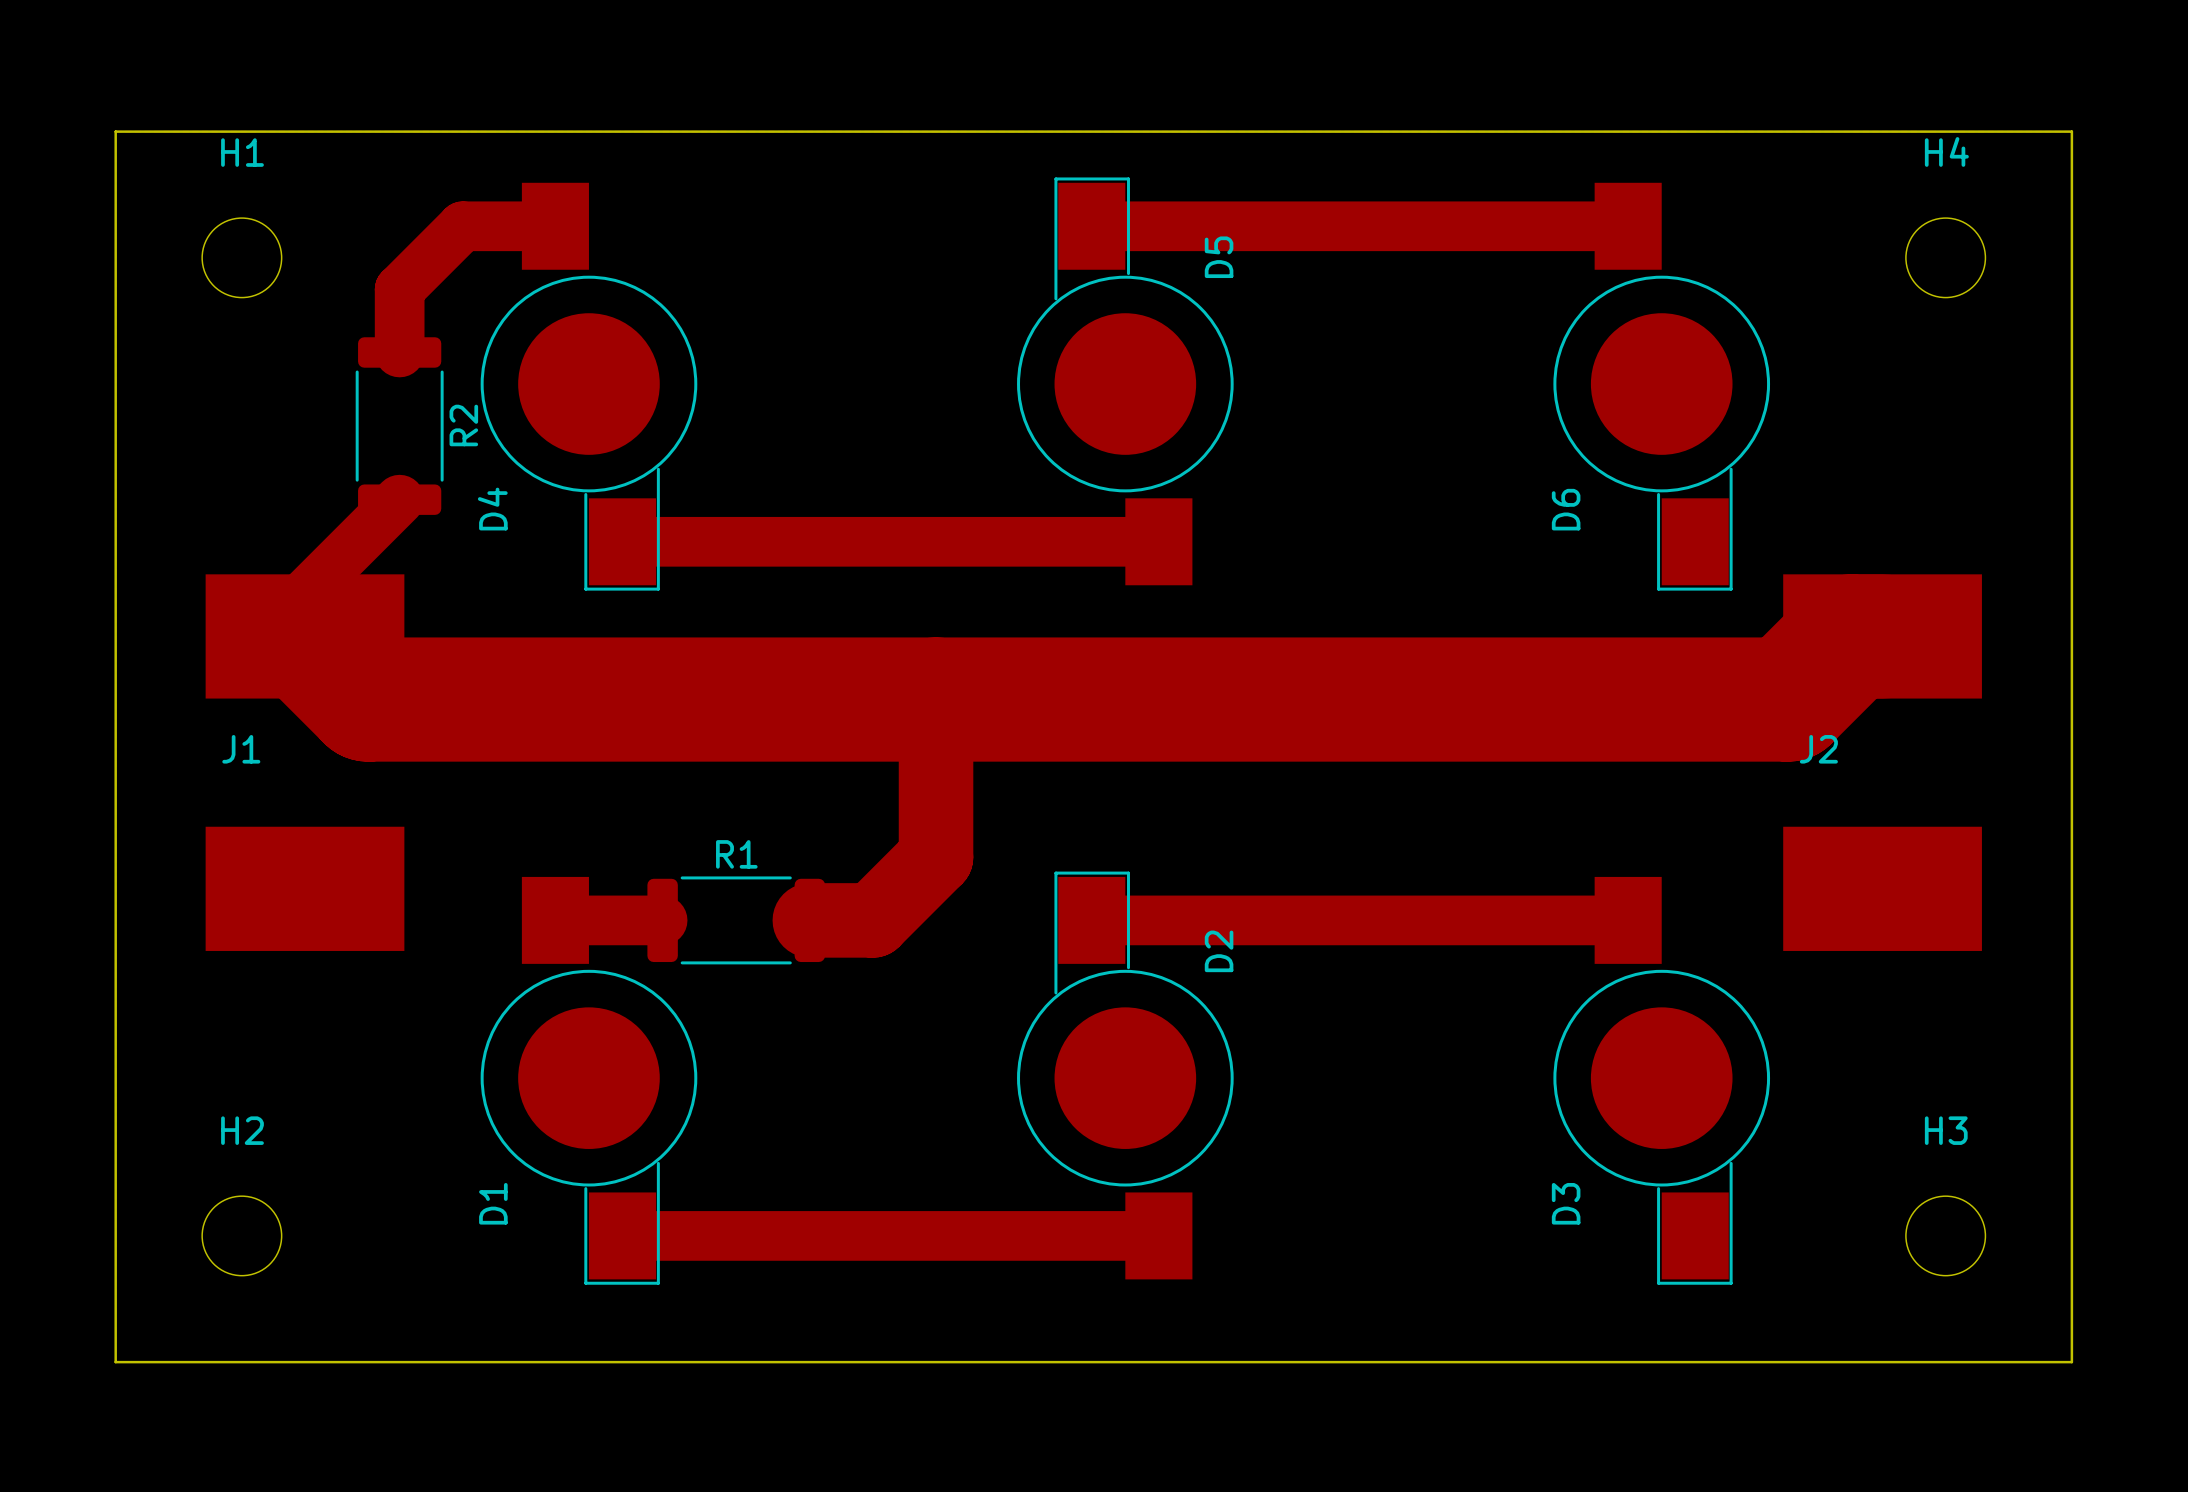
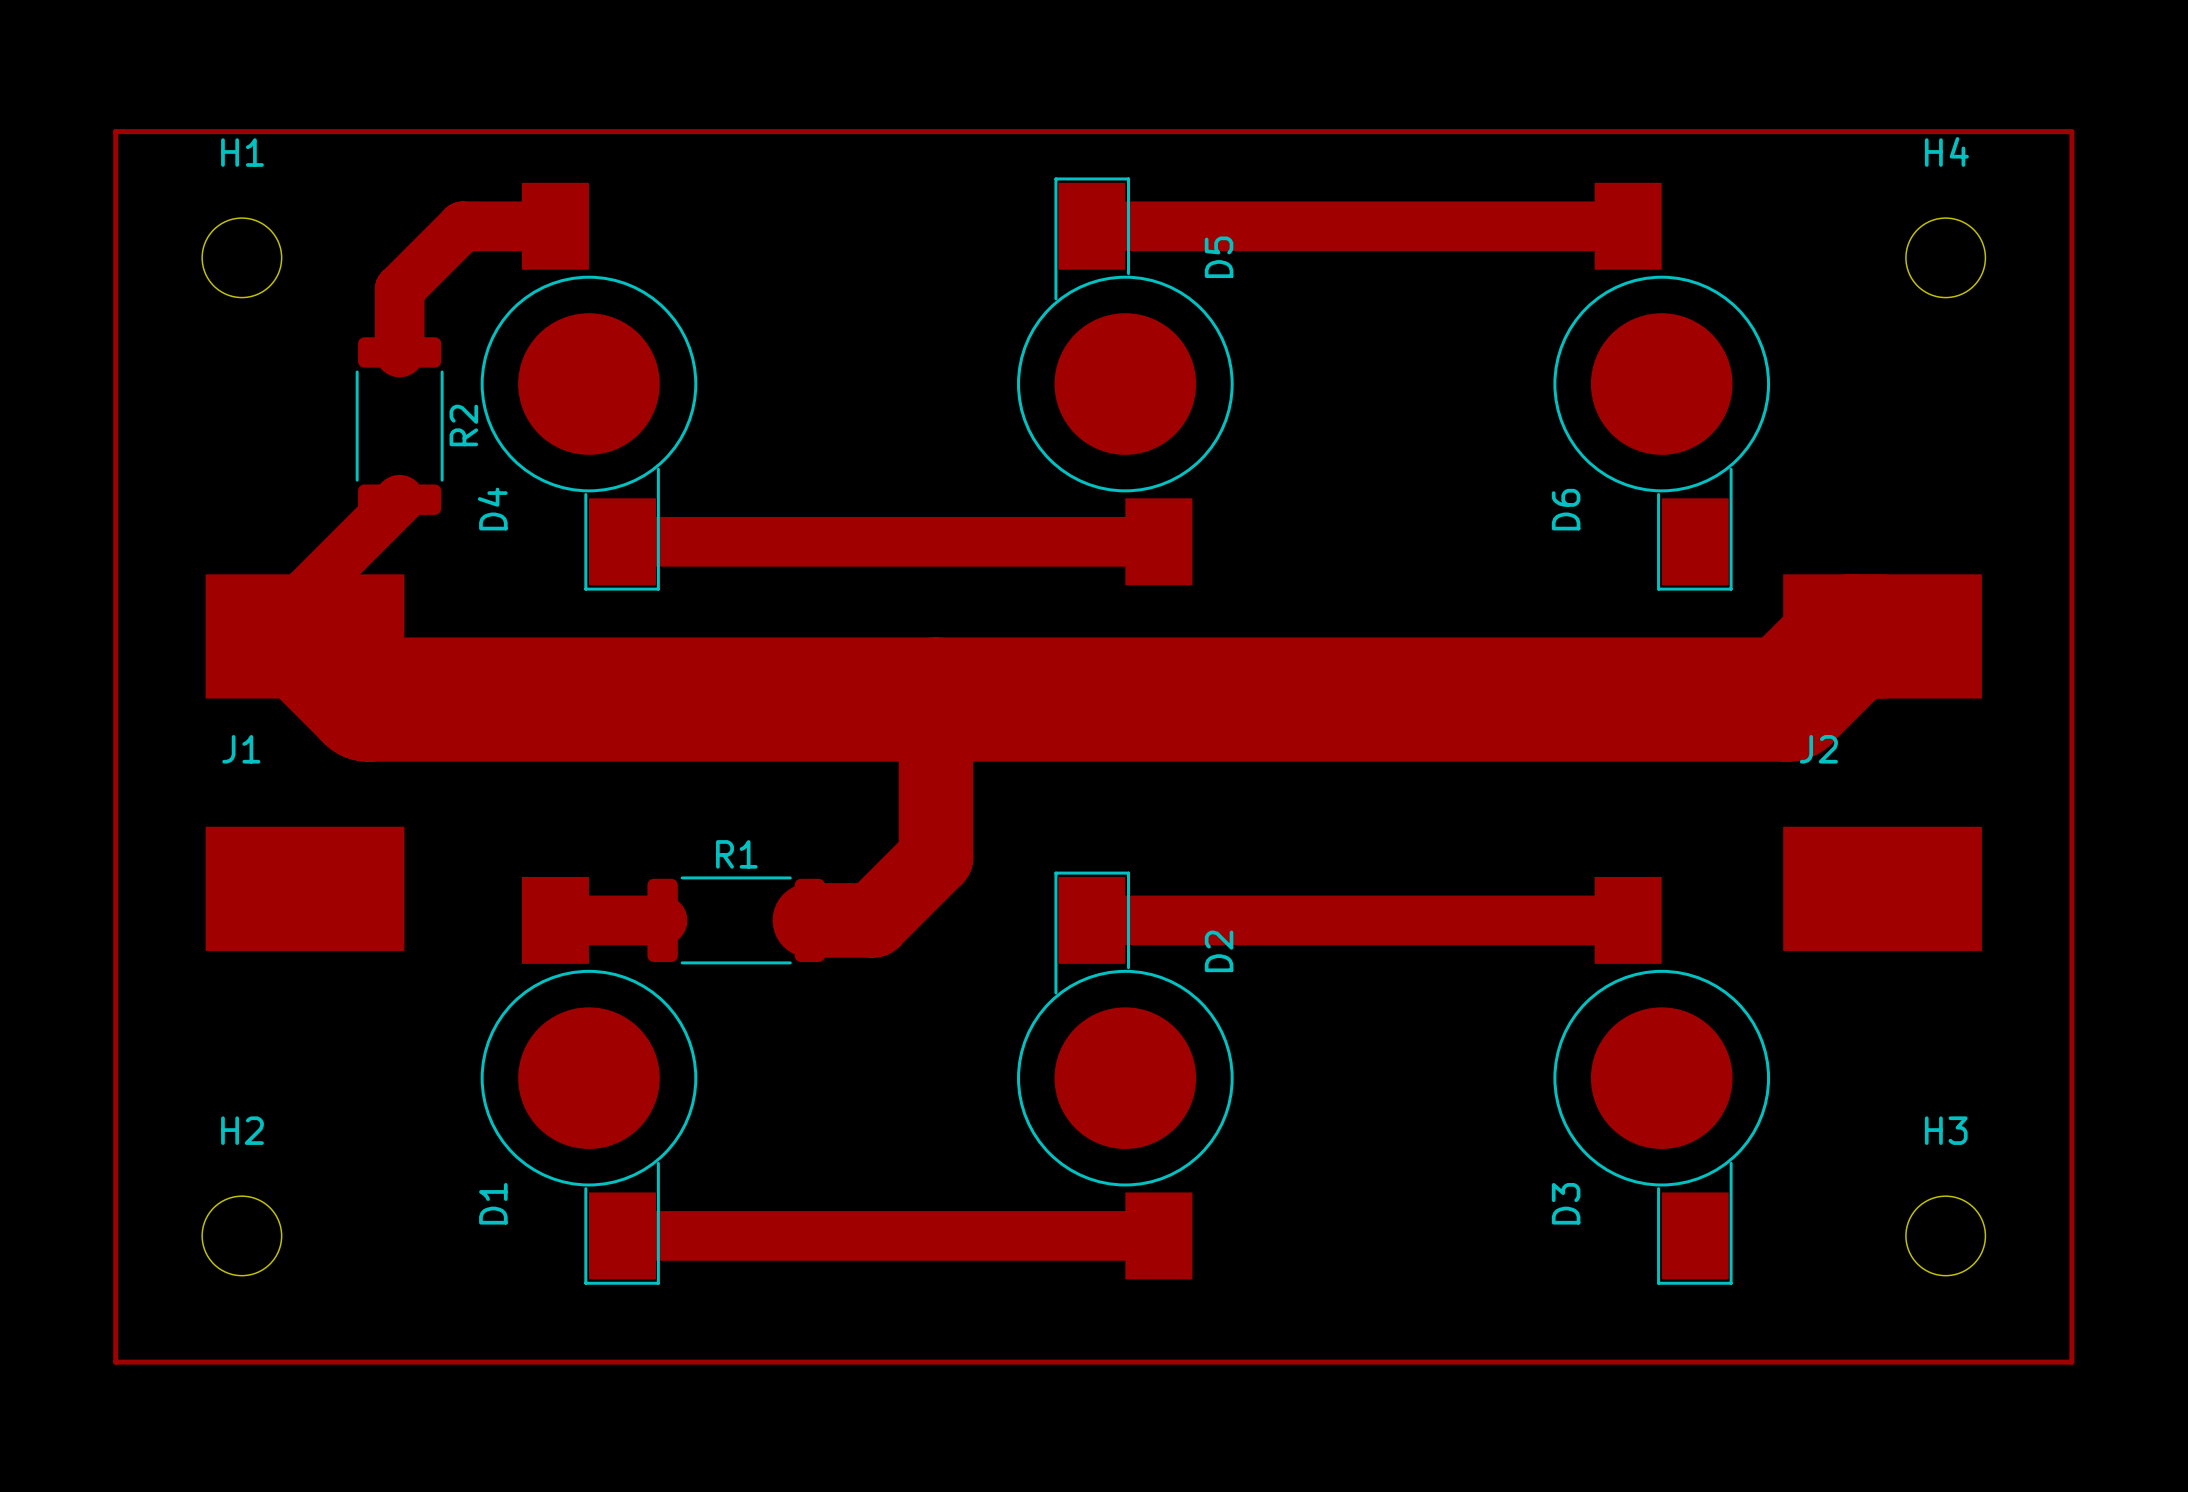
board edge: (115, 131) (2071, 131) (2071, 1362) (115, 1362) (115, 131) -> none
top track: none -> (115, 131) (2071, 131) (2071, 1362) (115, 1362) (115, 131)

